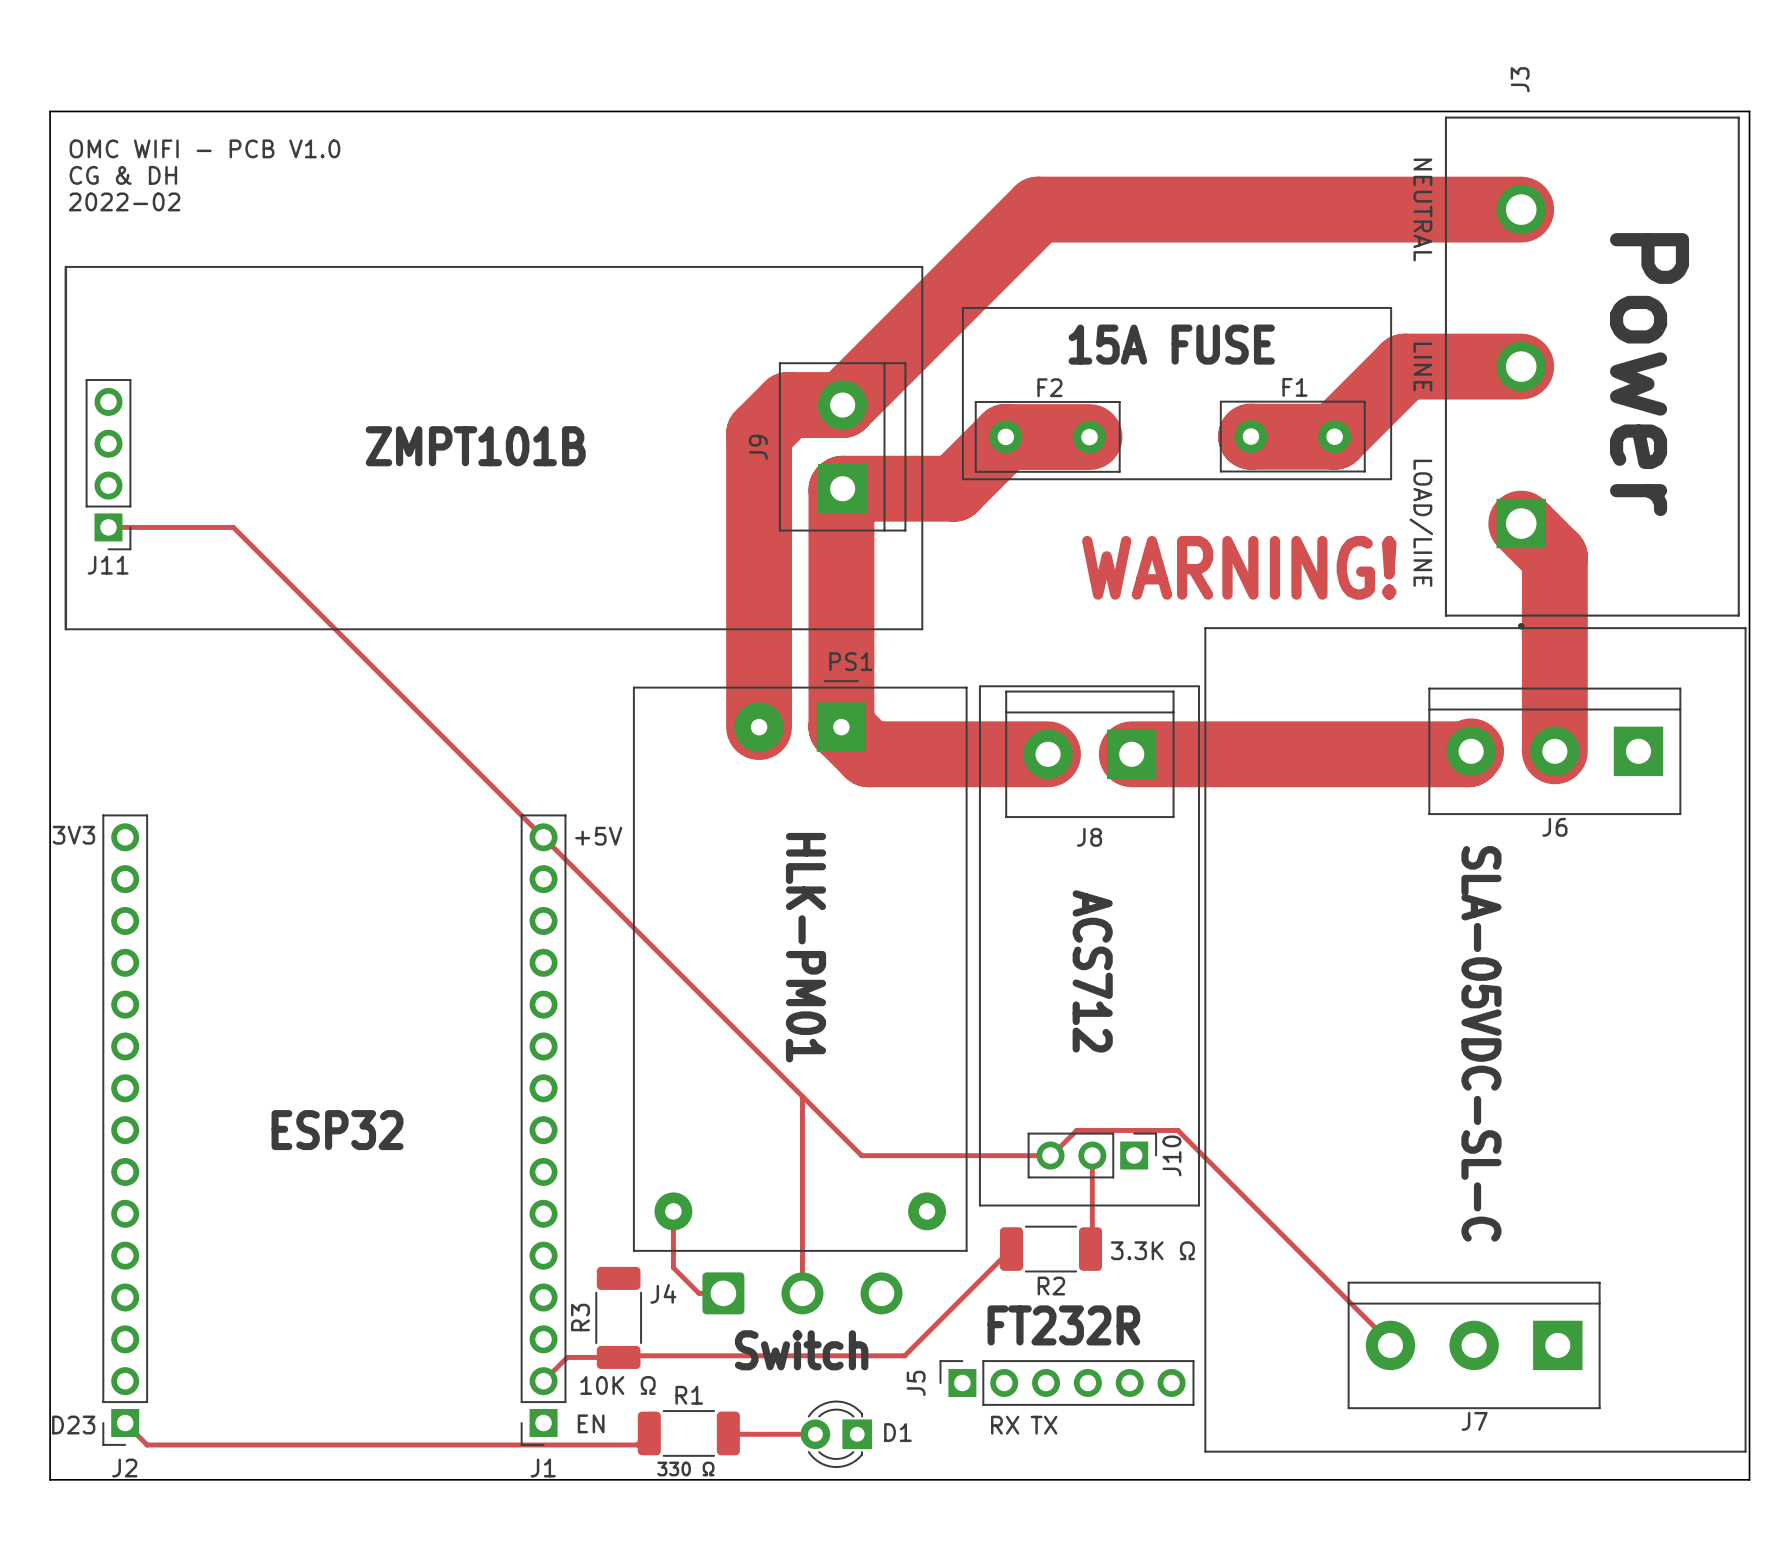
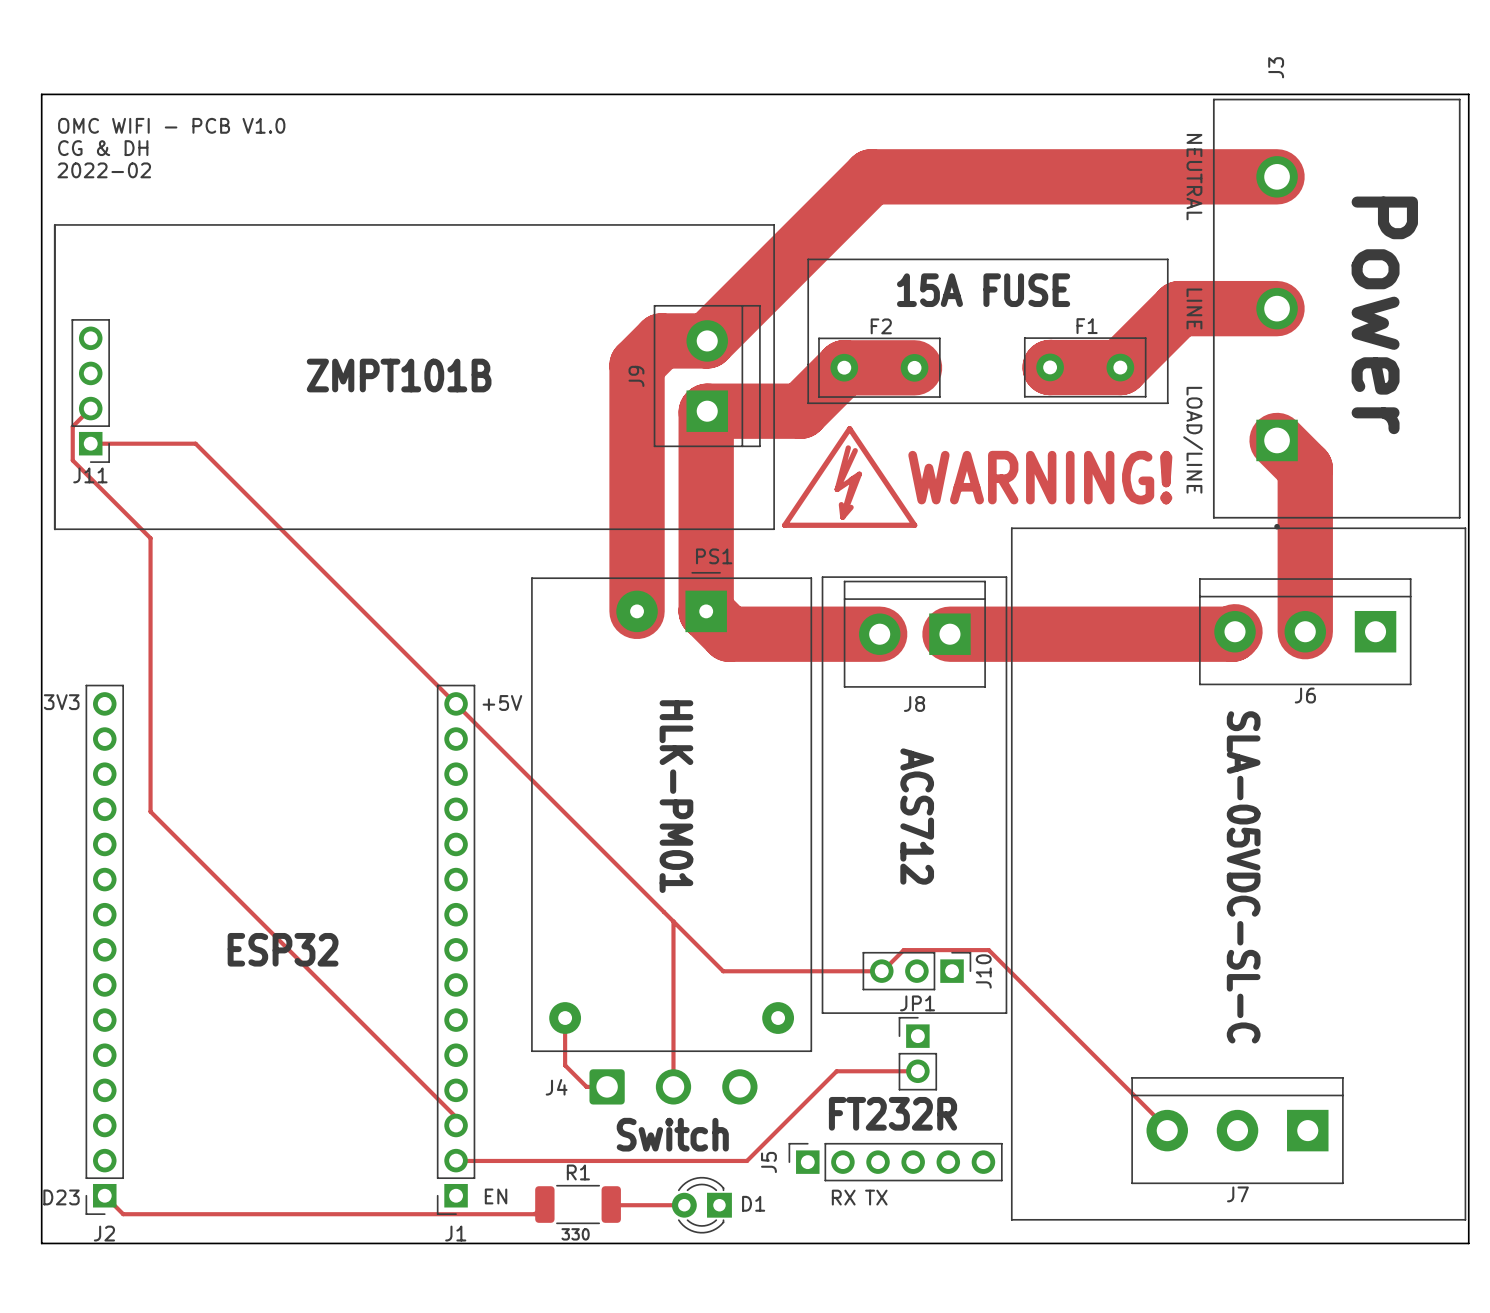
track: none -> (90, 408) (72, 426) (72, 460) (150, 538) (150, 811) (456, 1117)
drawing: none -> [782, 426, 918, 528]
track: (1092, 1155) (1092, 1247) (1090, 1249) -> none
track: (1011, 1249) (904, 1355) (567, 1357) (543, 1381) -> (917, 1071) (836, 1071) (746, 1160) (456, 1160)
R2: (1051, 1249) -> none
text: 3.3K Ω (1152, 1250) -> none
JP1: none -> (917, 1053)
R3: (618, 1317) -> none
text: 10K Ω (618, 1385) -> none
text: 330 Ω (685, 1468) -> 330 (575, 1234)

